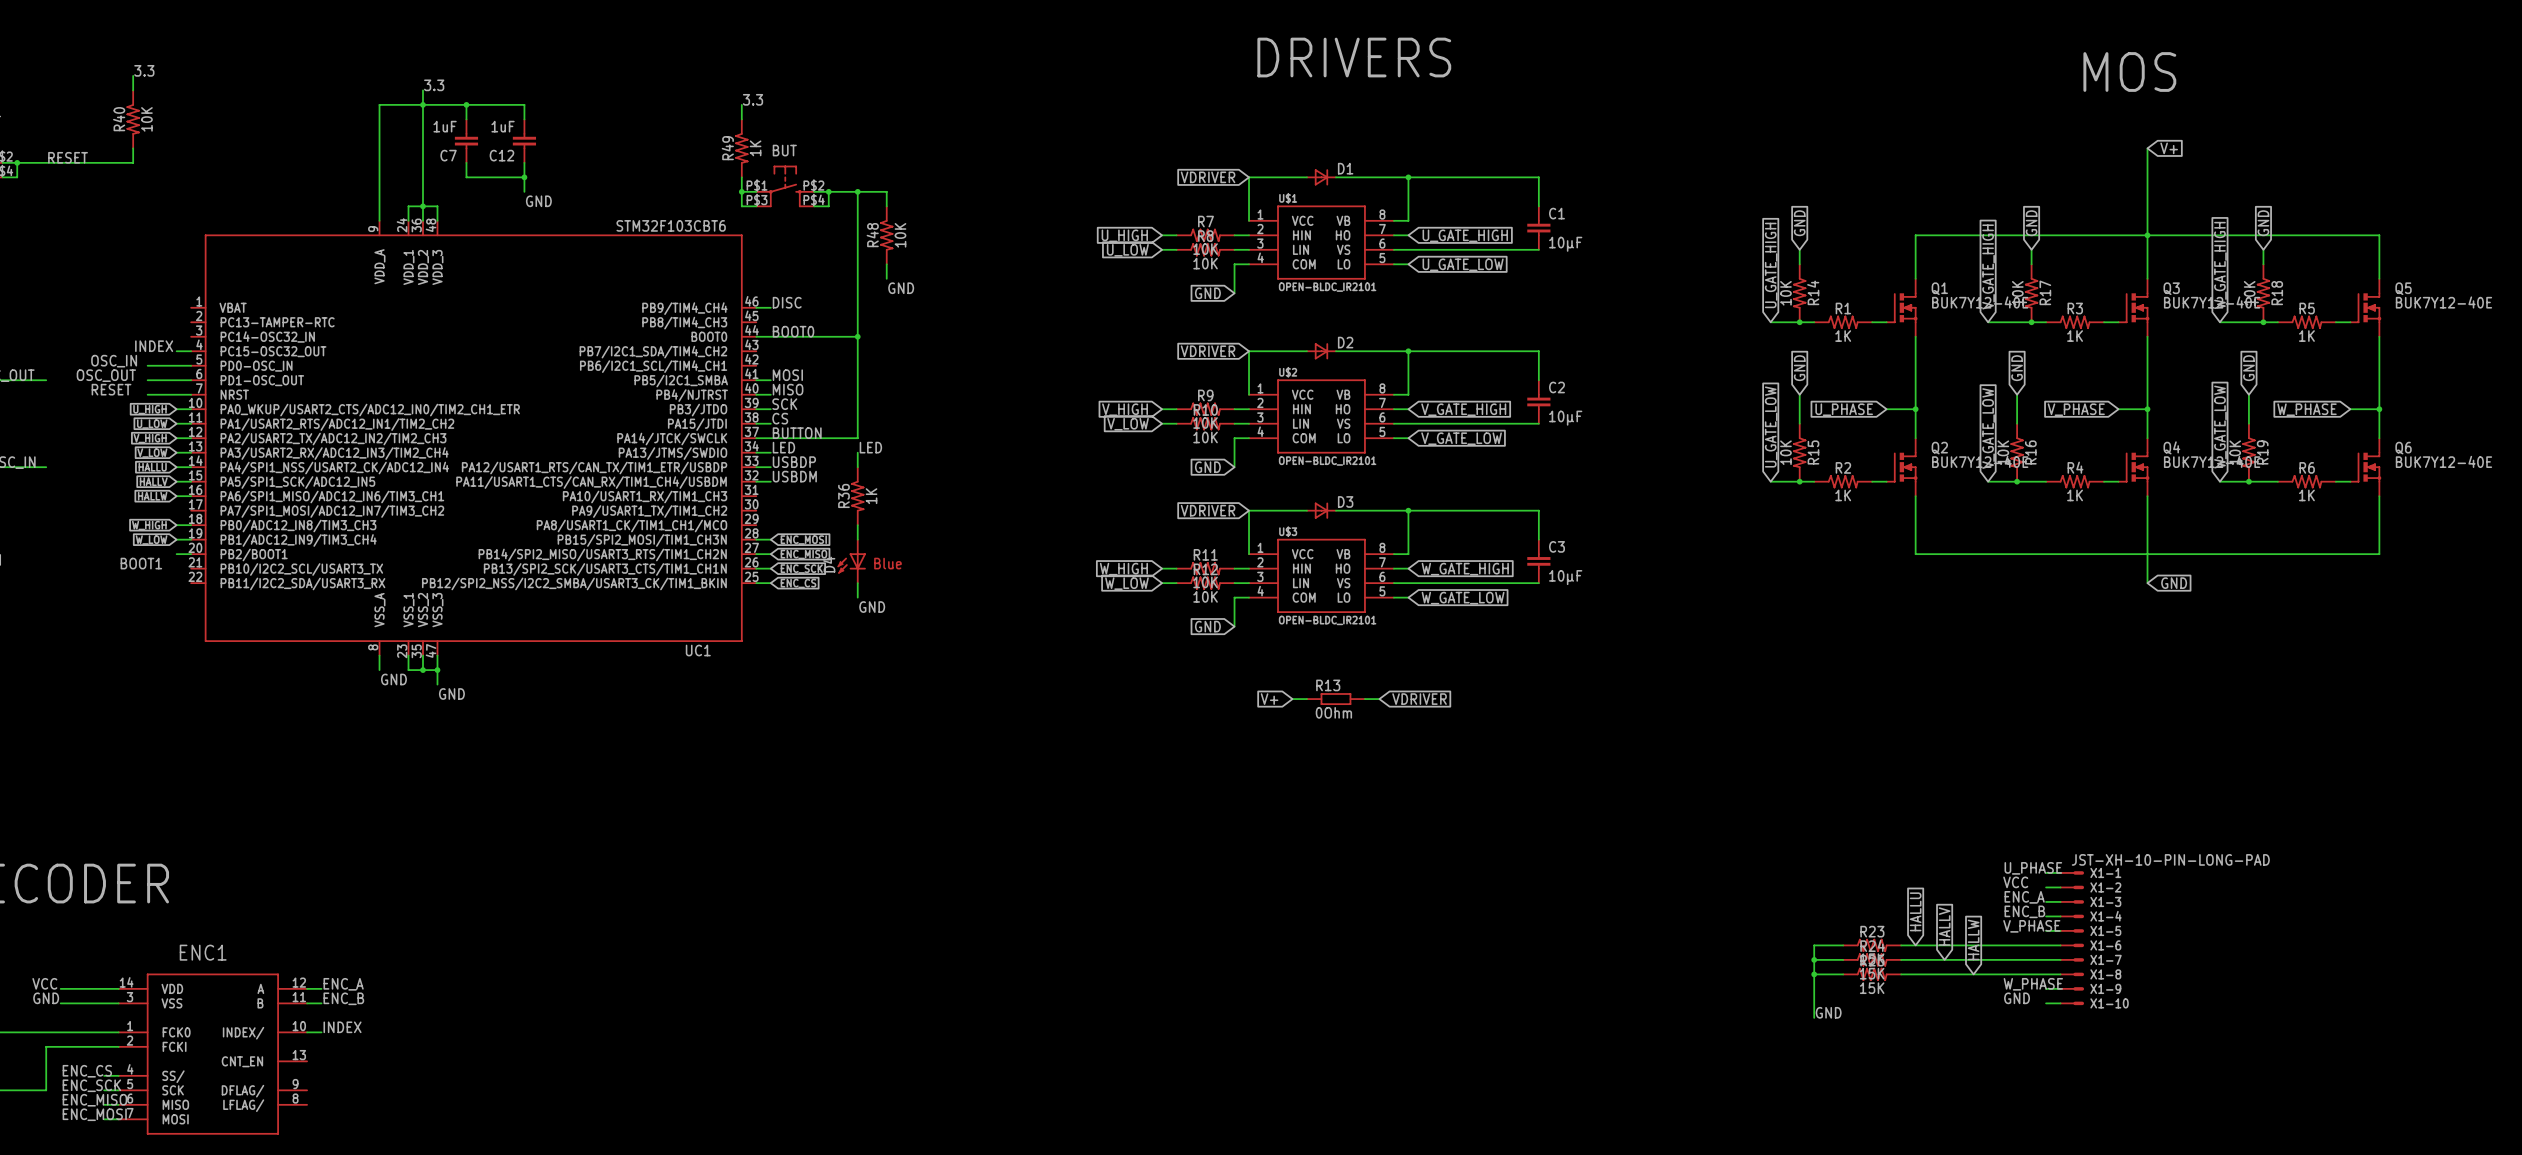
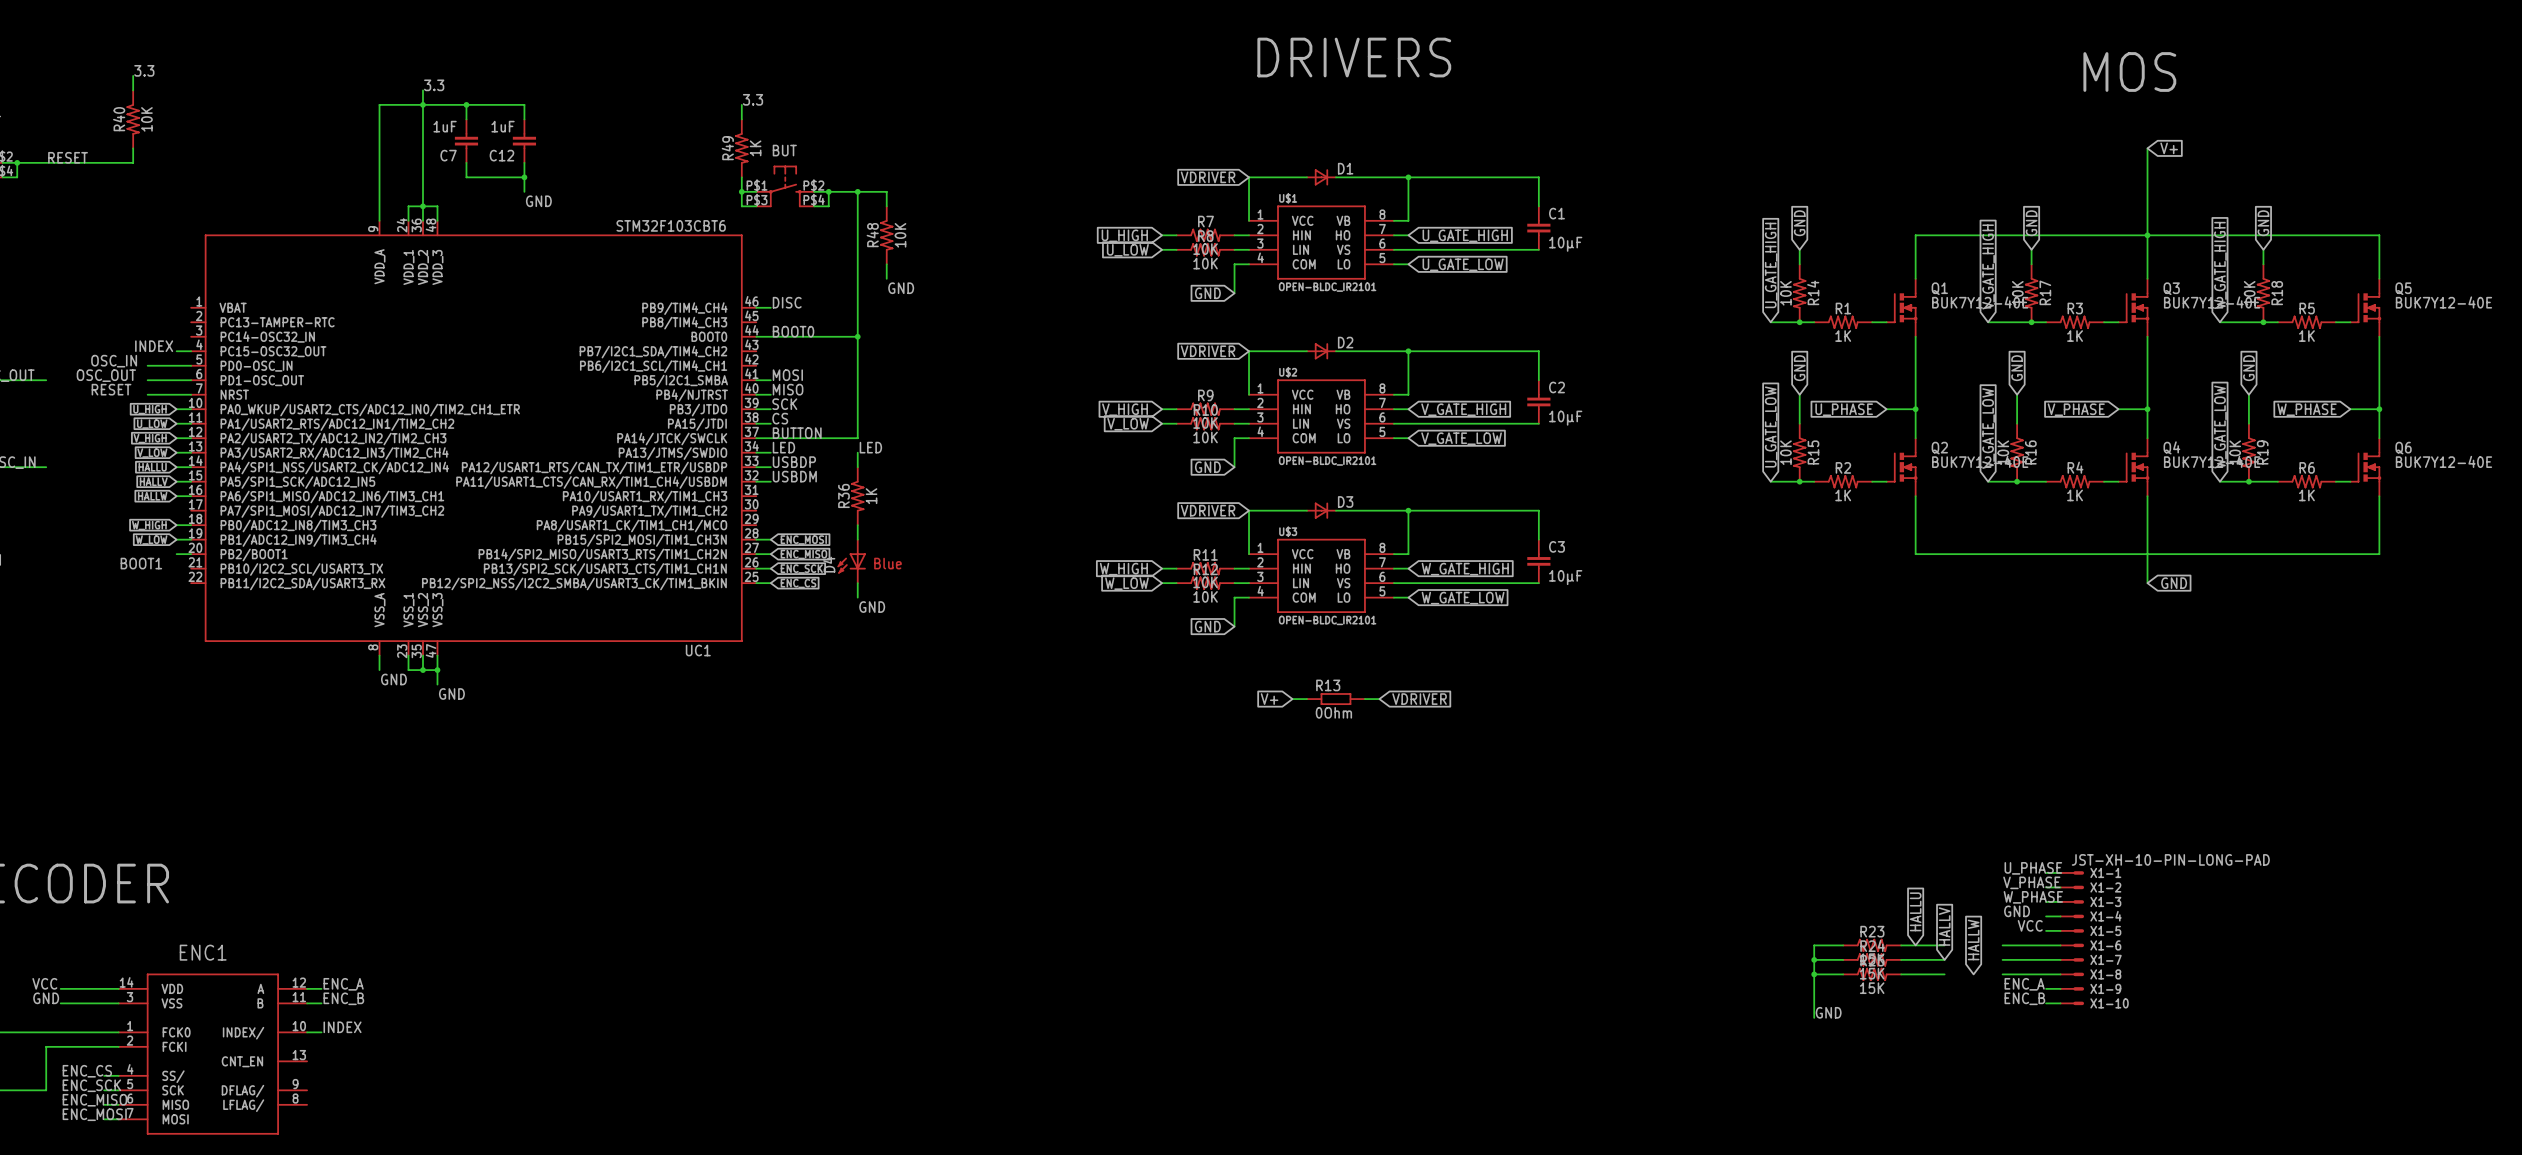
label: VCC (2015, 882) -> V_PHASE (2031, 882)
label: ENC_A (2024, 897) -> W_PHASE (2033, 897)
label: ENC_B (2024, 911) -> GND (2017, 911)
label: none -> VCC (2030, 925)
label: V_PHASE (2031, 926) -> none
wire: (1944, 945) (2002, 945) -> none
wire: (1944, 959) (2002, 959) -> none
wire: (1944, 974) (2002, 974) -> none
label: W_PHASE (2033, 984) -> ENC_A (2024, 984)
label: GND (2017, 998) -> ENC_B (2024, 998)

